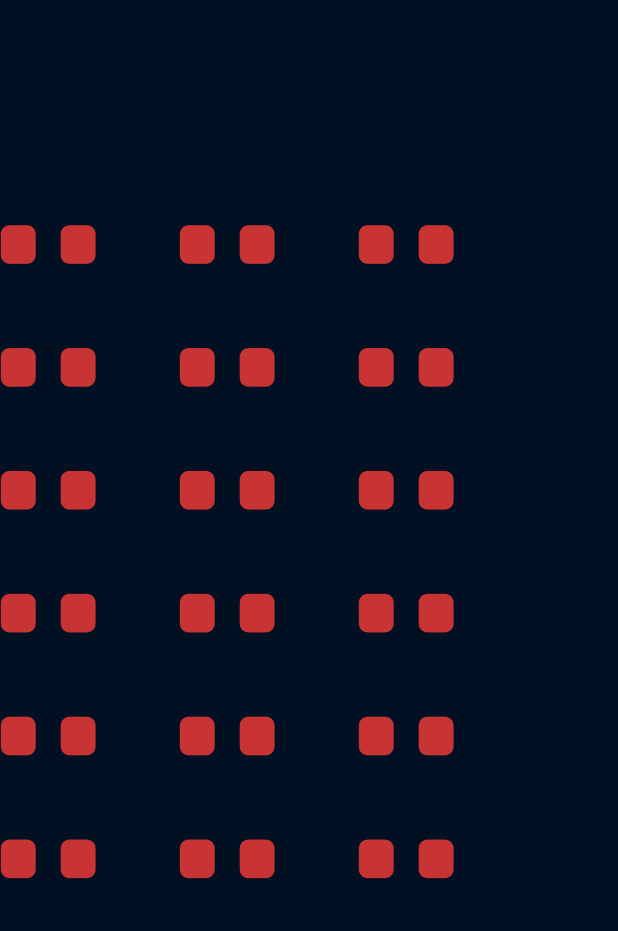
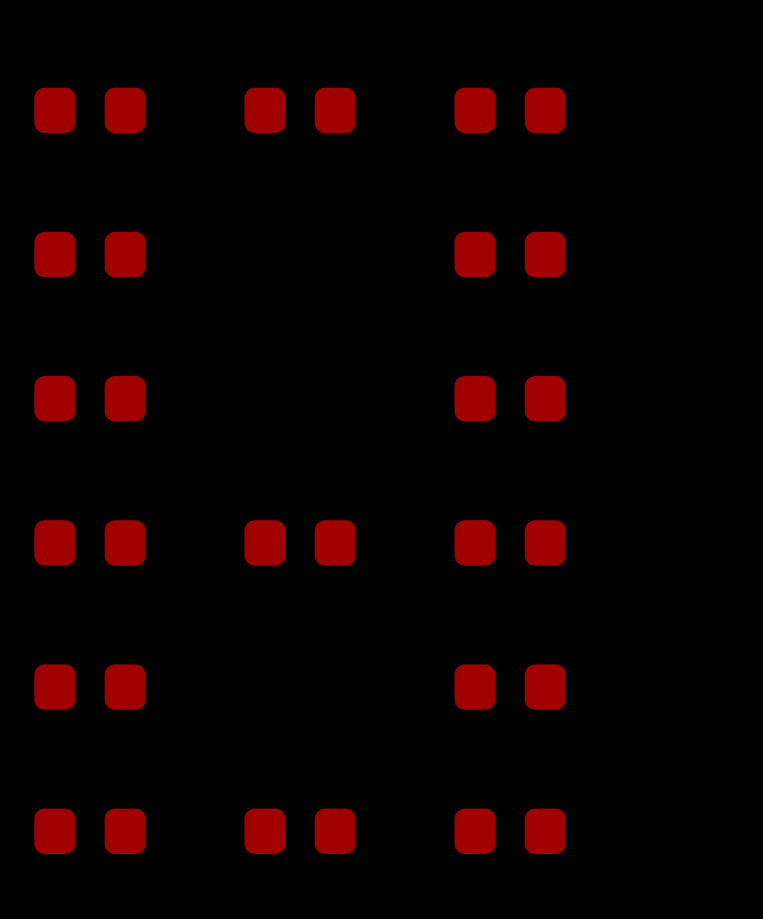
part: (227, 367) -> none
part: (227, 490) -> none
part: (227, 736) -> none

